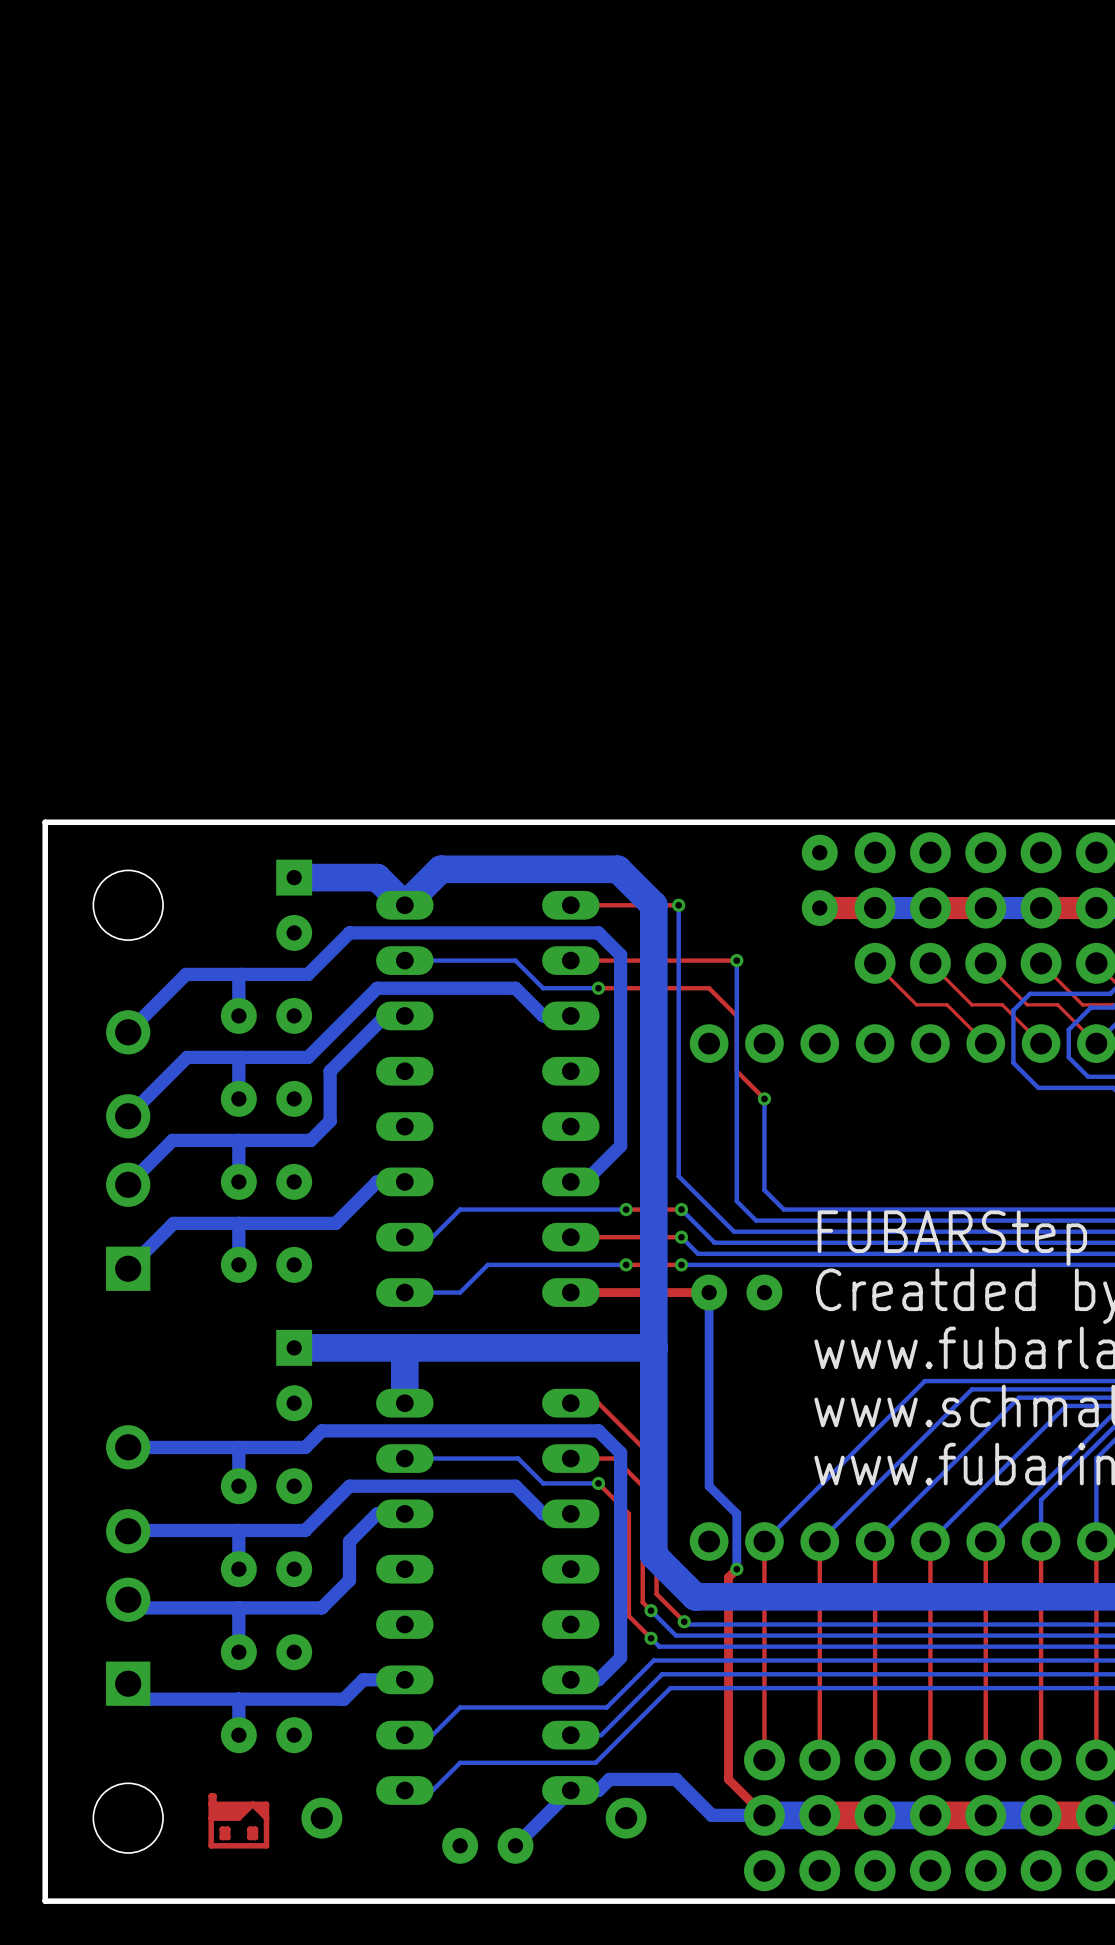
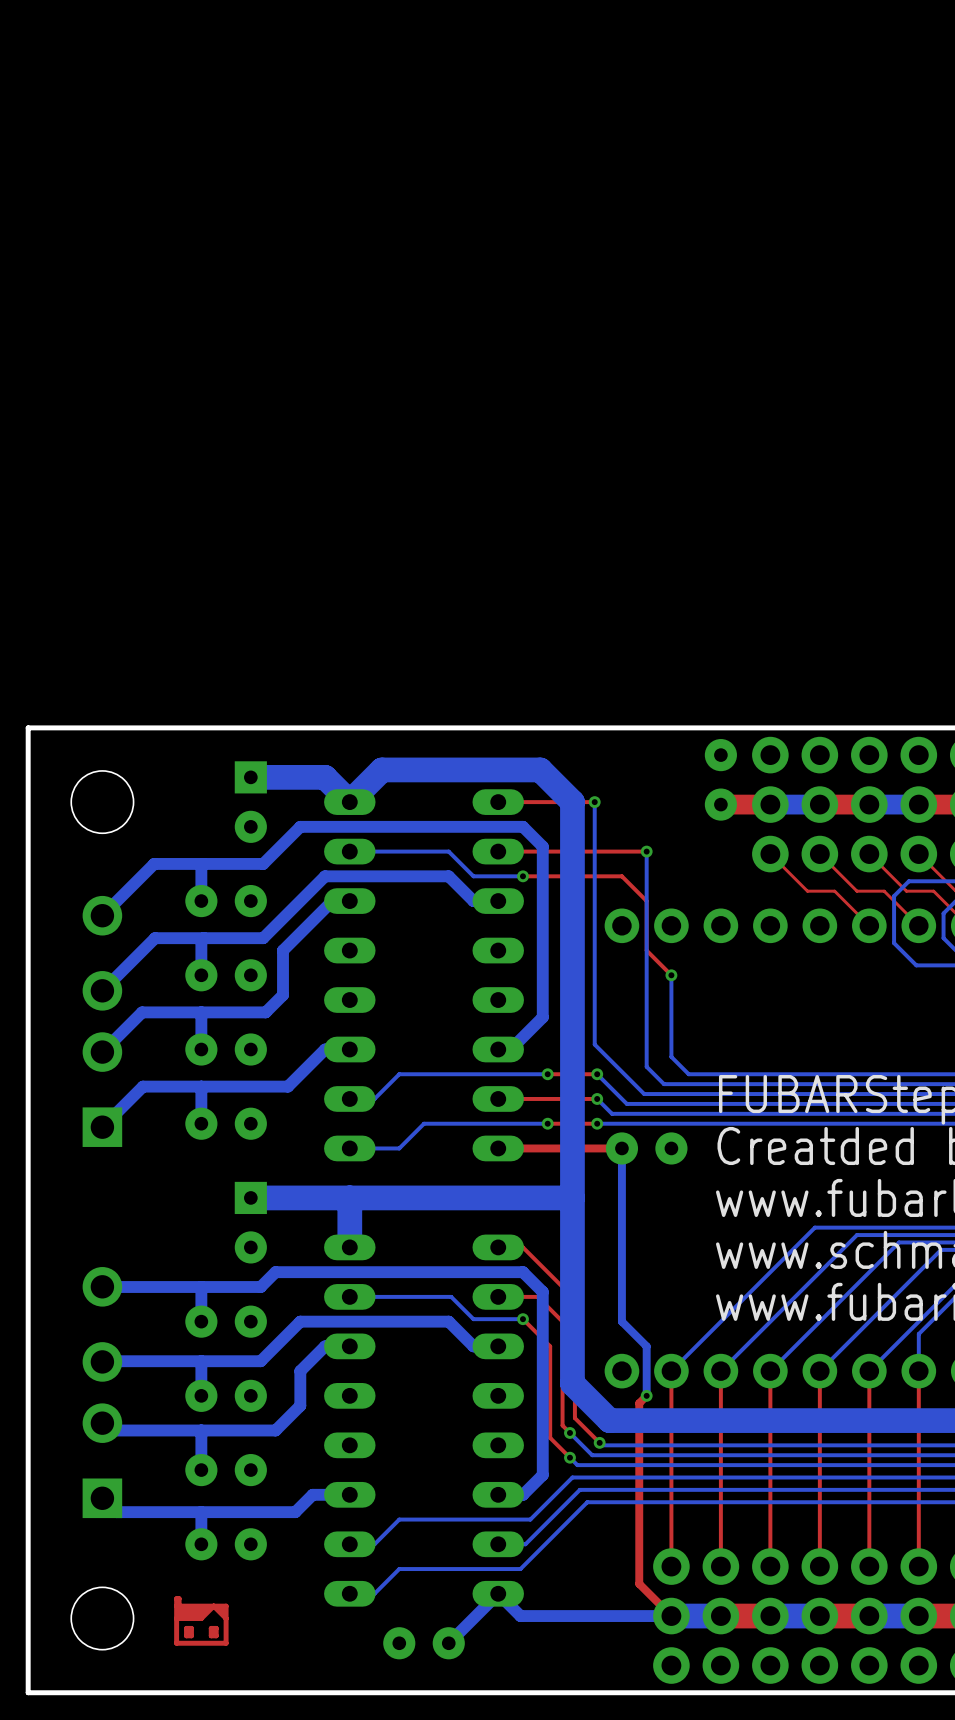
bottom track: (570, 1790) (598, 1790) (609, 1779) (675, 1779) (711, 1815) -> (498, 1593) (520, 1616) (624, 1616)
part: (321, 1818) -> none
part: (626, 1818) -> none

